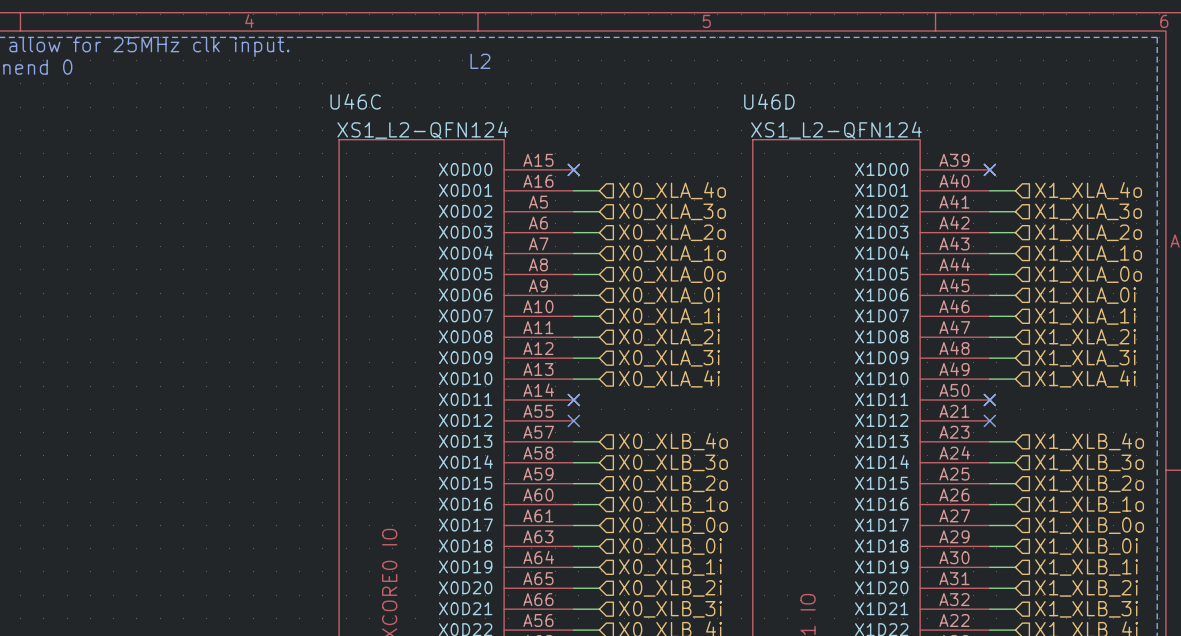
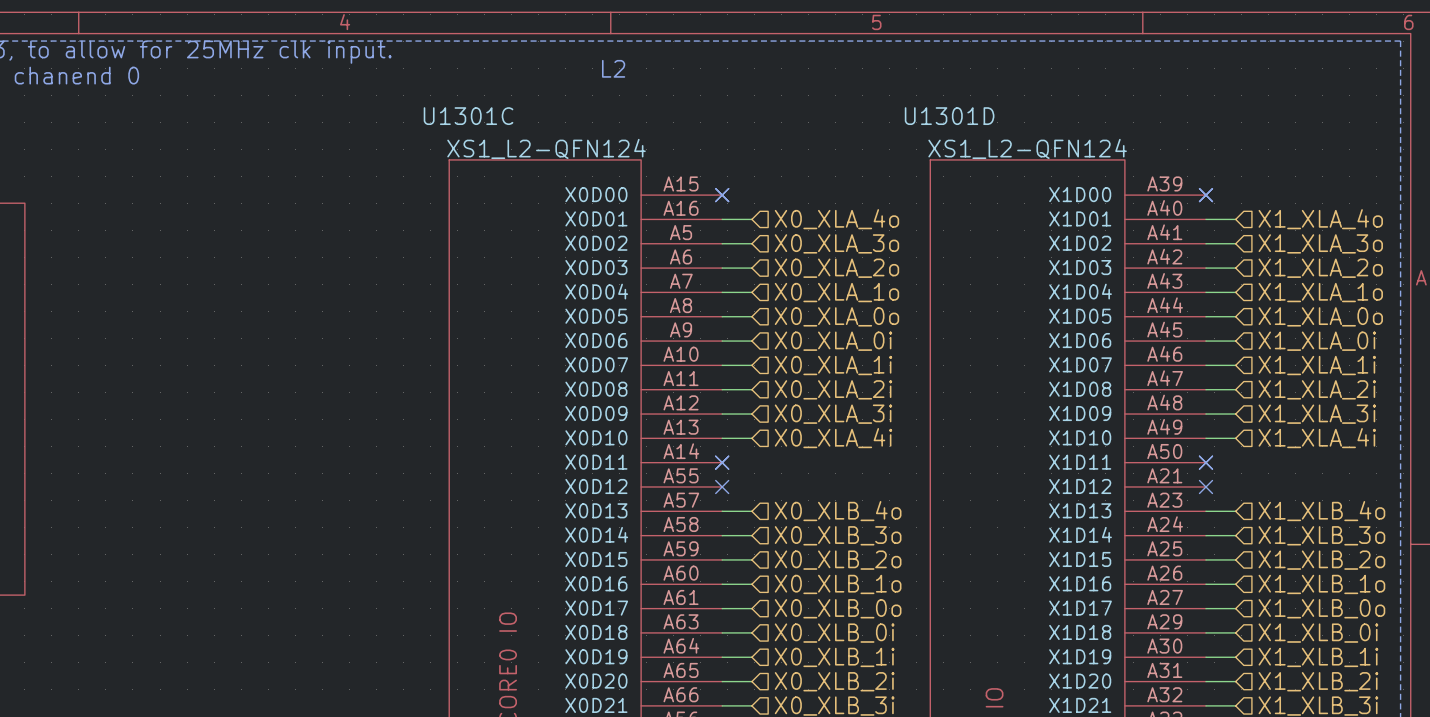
U46C name: U46C (355, 101) -> U1301C (468, 116)
U46D name: U46D (769, 101) -> U1301D (949, 116)

